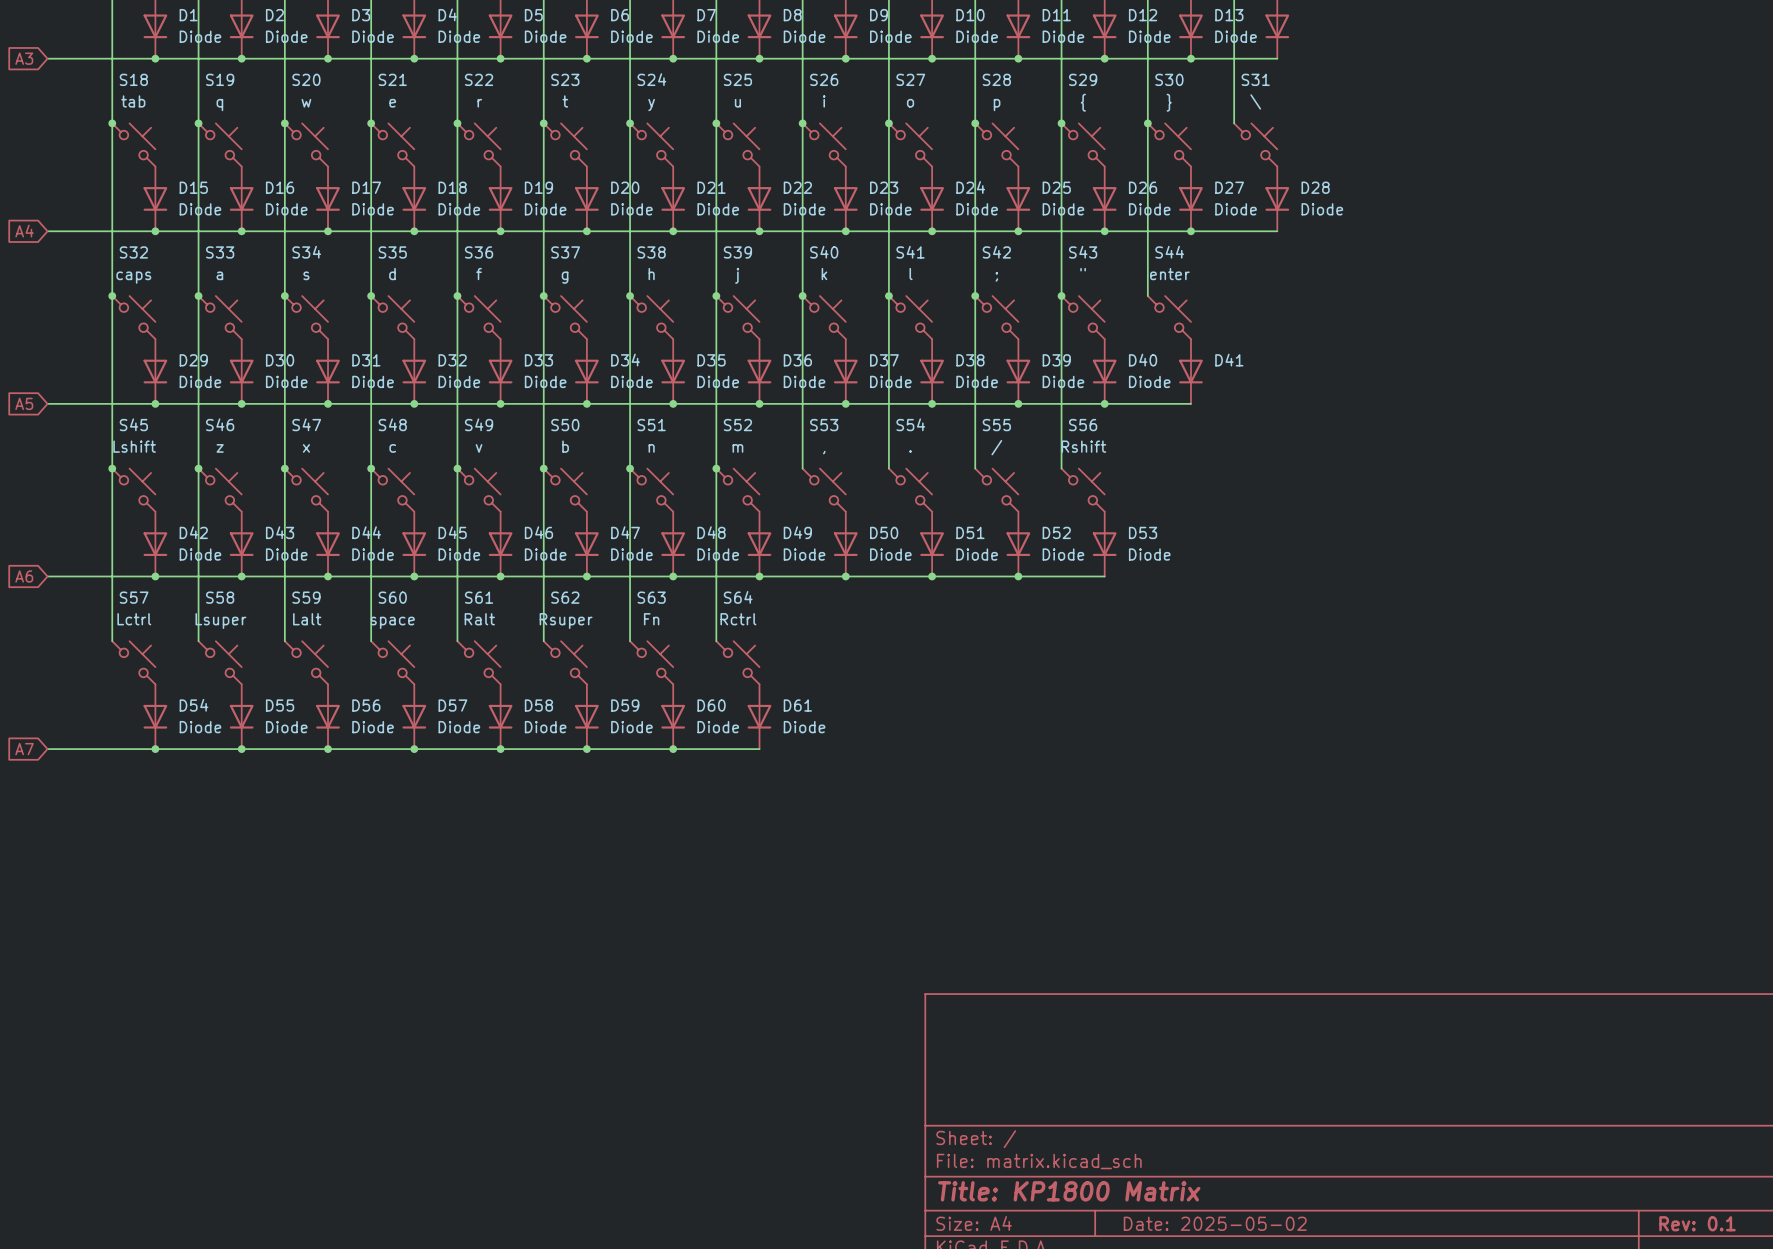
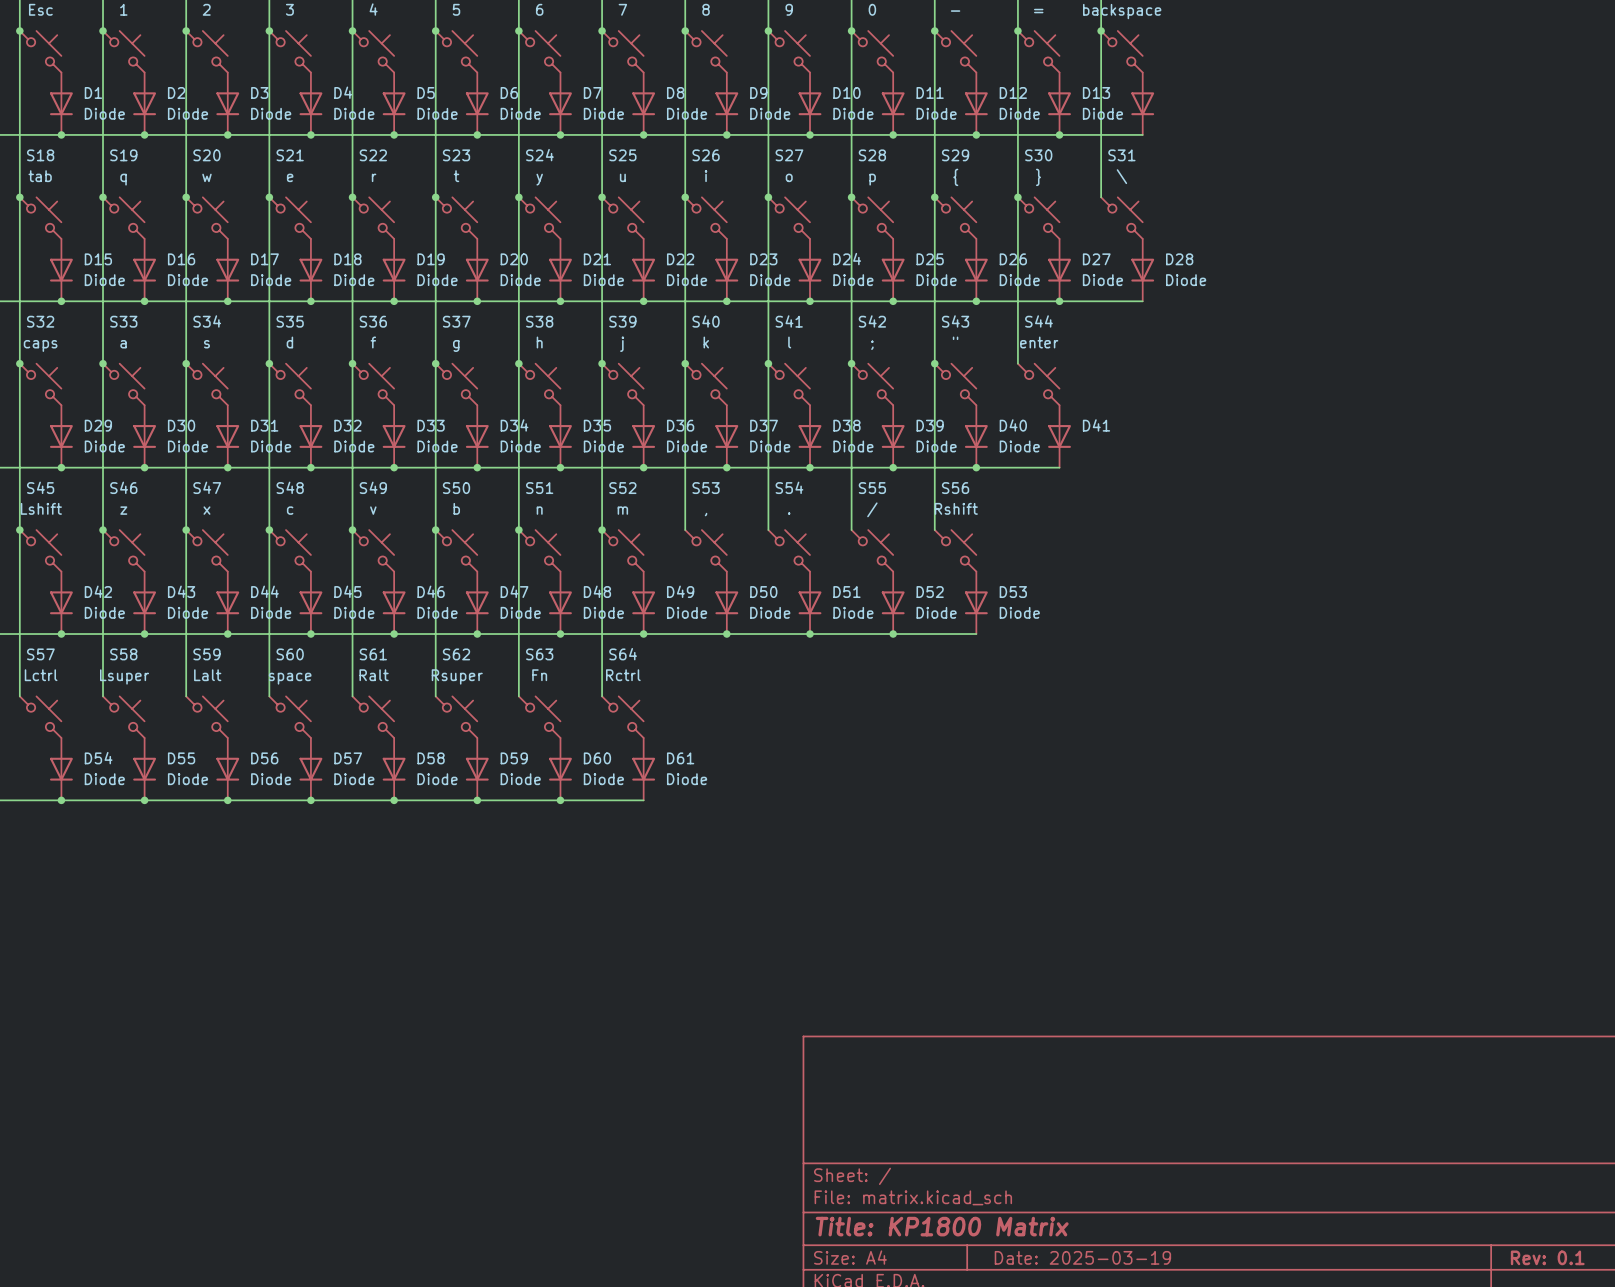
title block: Date: 2025-05-02 (1215, 1223) -> Date: 2025-03-19 (1082, 1257)

